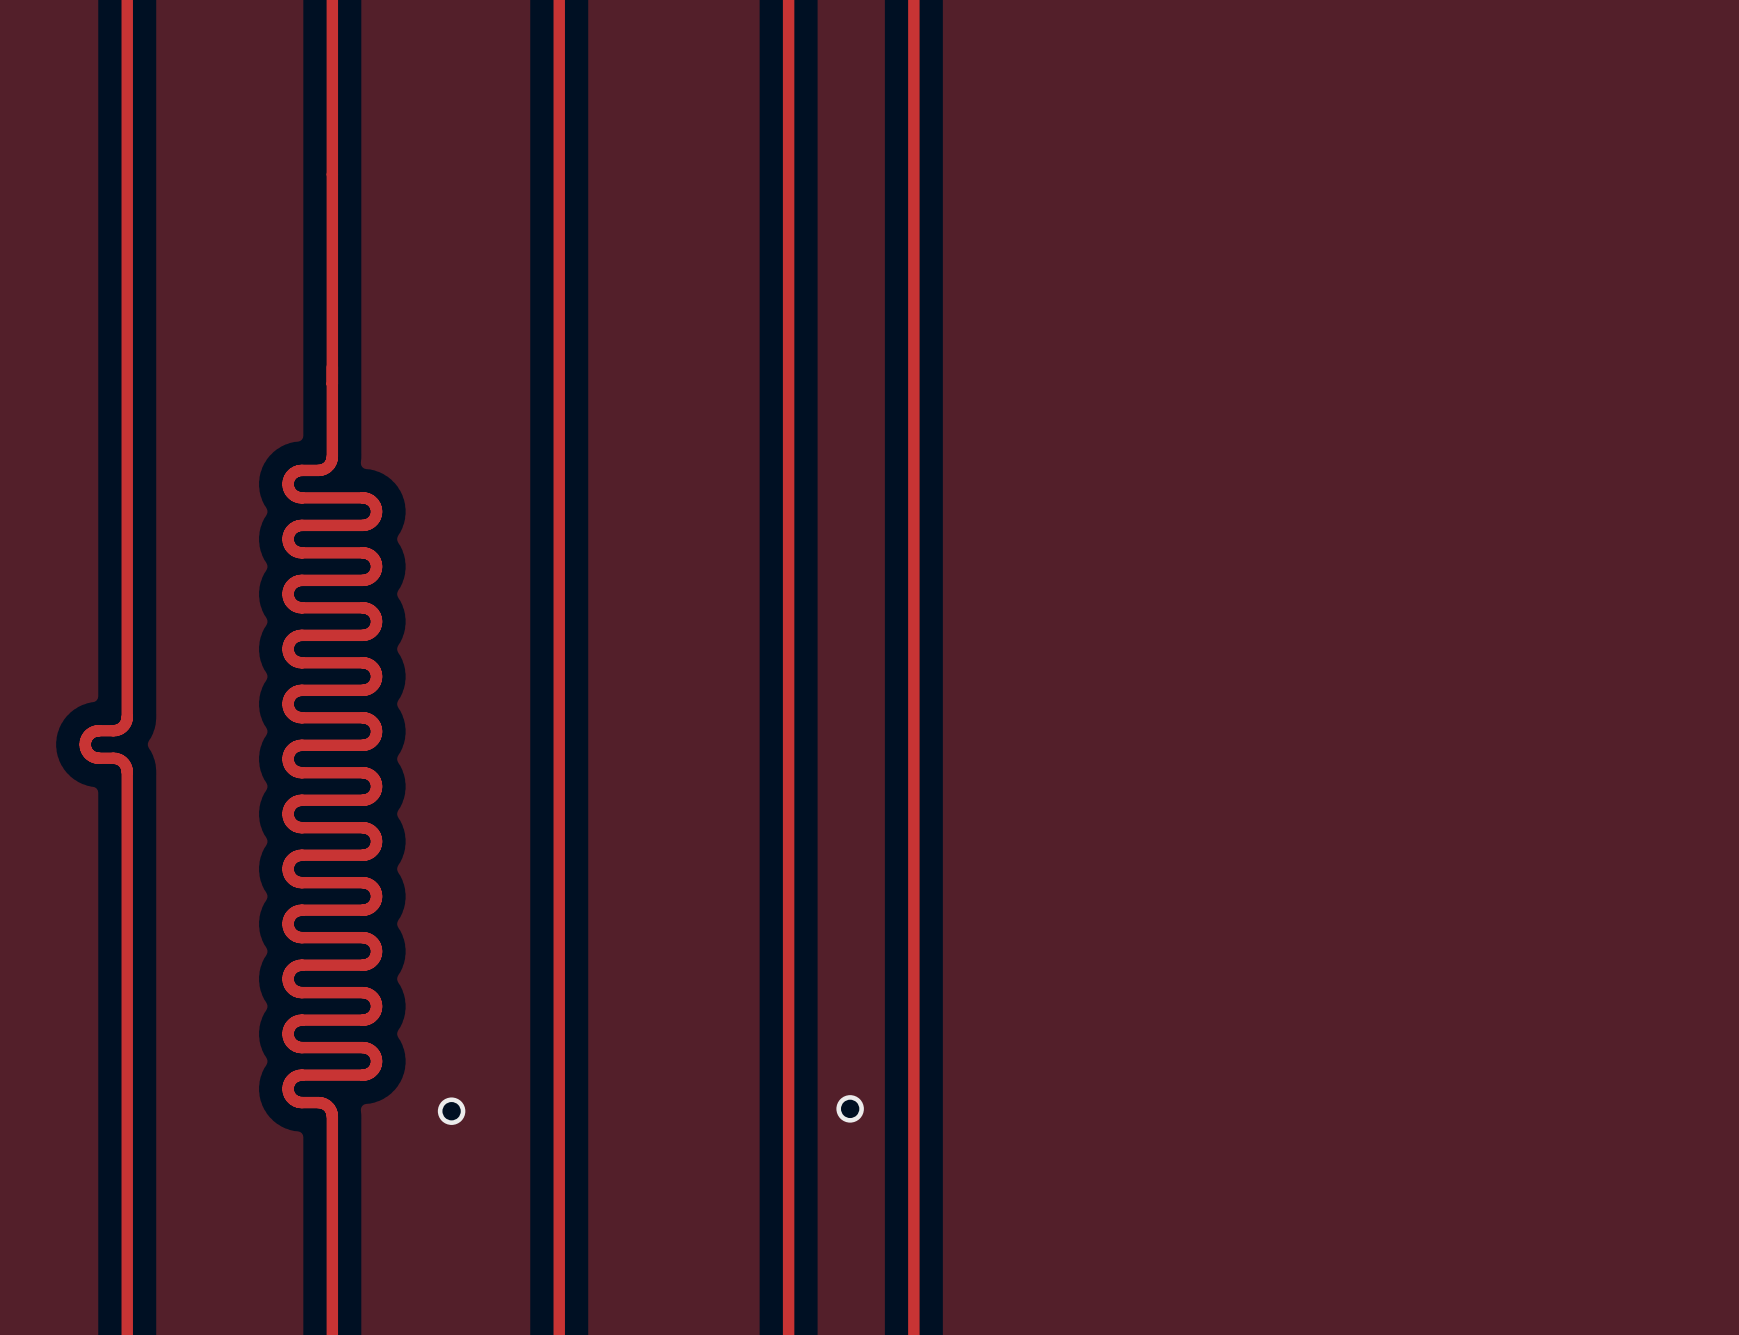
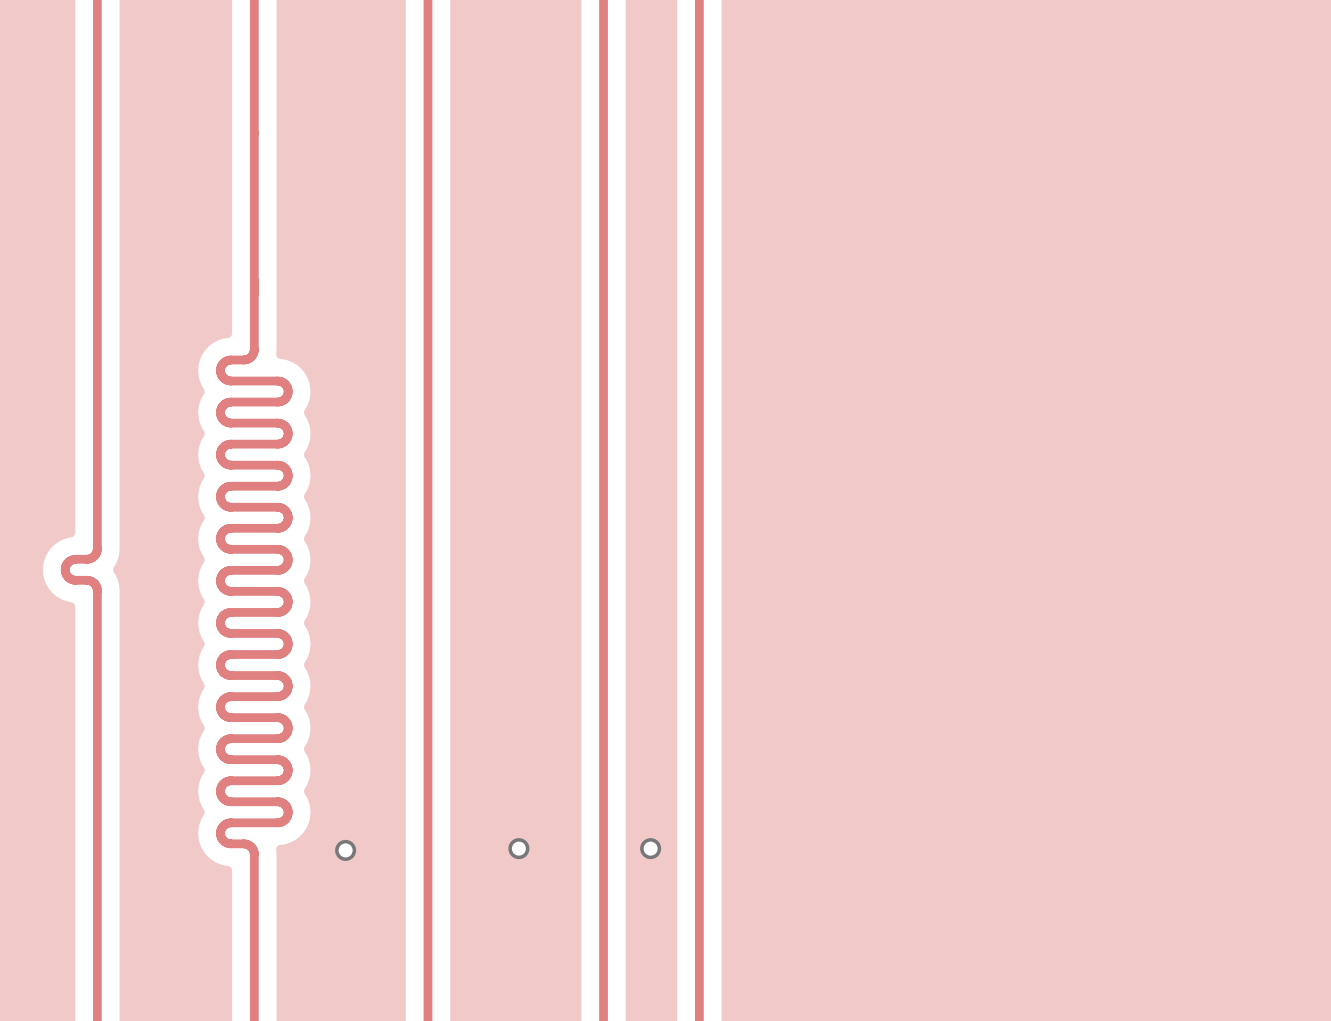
via: none -> (518, 848)

